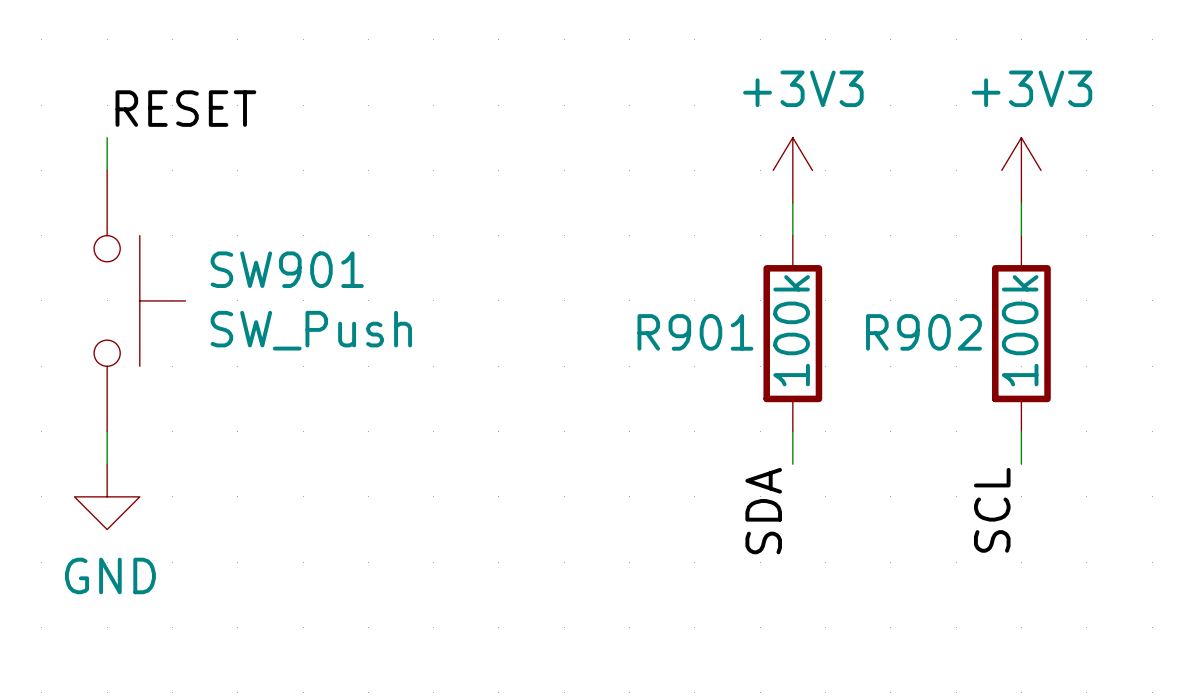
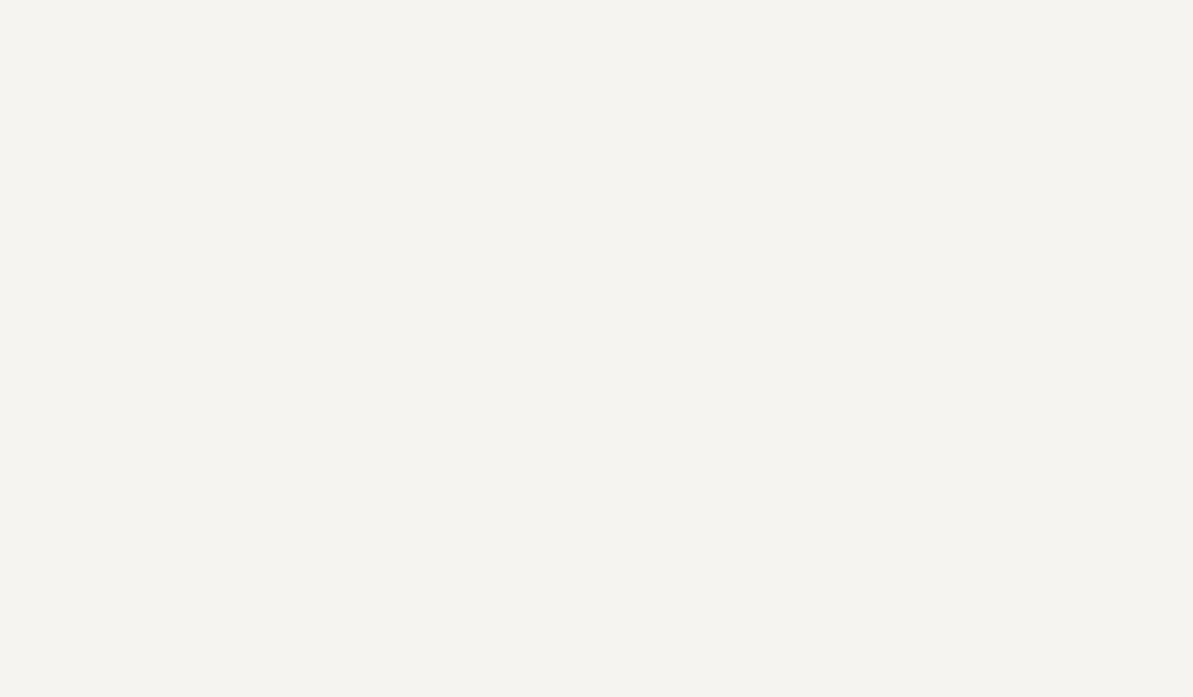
label: RESET (185, 108) -> none
wire: (107, 137) (107, 170) -> none
power symbol: +3V3 (792, 170) -> none
power symbol: +3V3 (1021, 170) -> none
wire: (792, 203) (792, 235) -> none
wire: (1021, 203) (1021, 235) -> none
SW901: SW_Push (139, 300) -> none
R901: 100k (792, 333) -> none
R902: 100k (1021, 333) -> none
wire: (107, 431) (107, 464) -> none
wire: (792, 431) (792, 464) -> none
wire: (1021, 431) (1021, 464) -> none
power symbol: GND (107, 496) -> none
label: SCL (992, 510) -> none
label: SDA (763, 511) -> none

